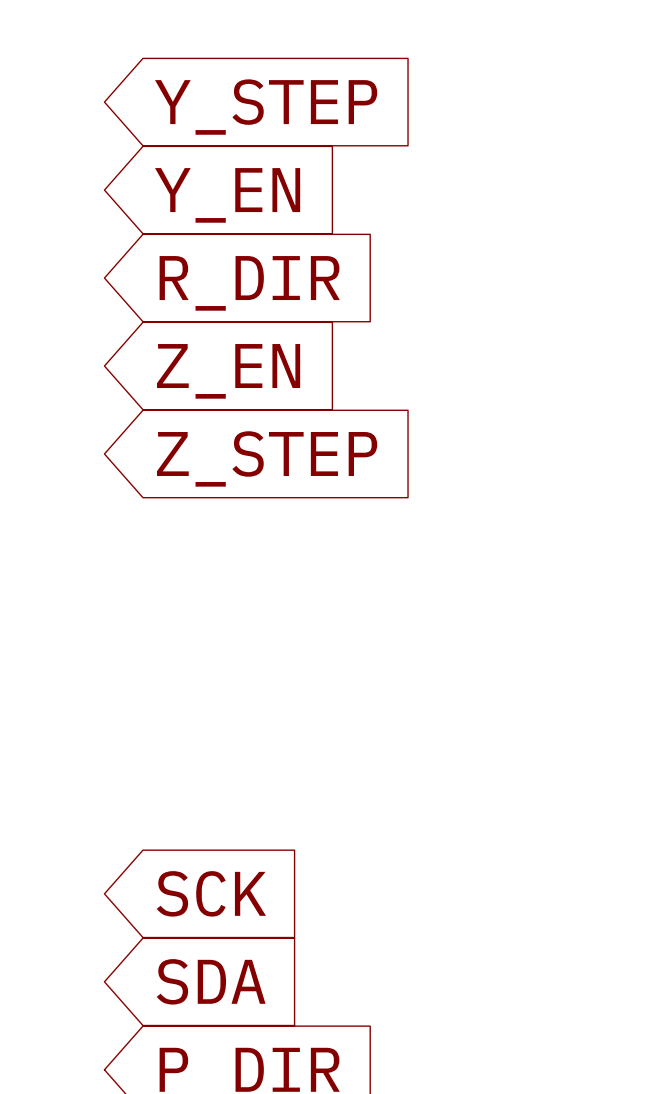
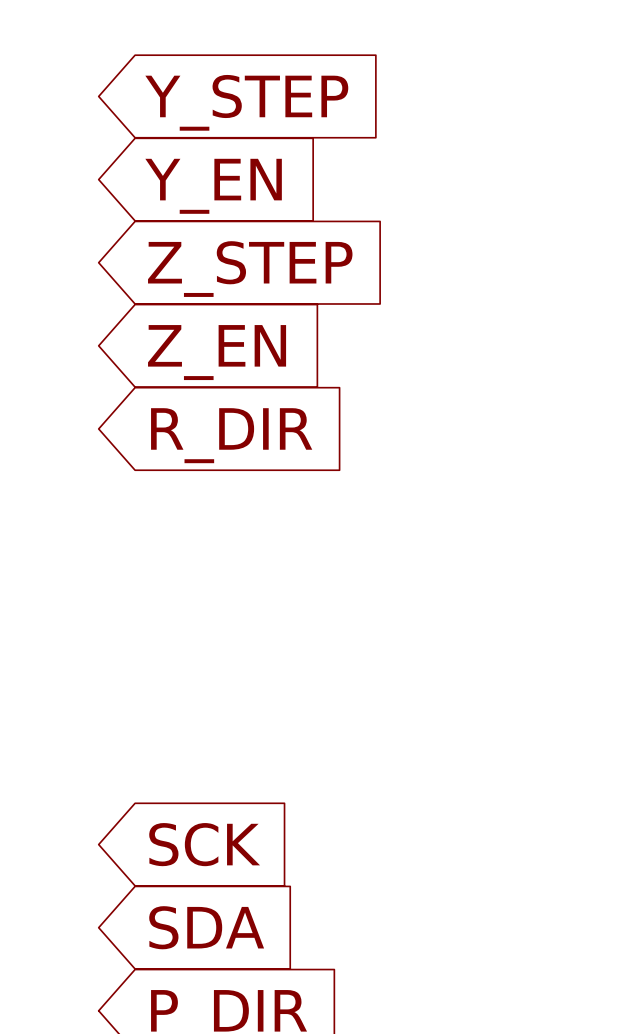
global label: R_DIR (249, 283) -> Z_STEP (250, 269)
global label: Z_STEP (267, 458) -> R_DIR (231, 435)

